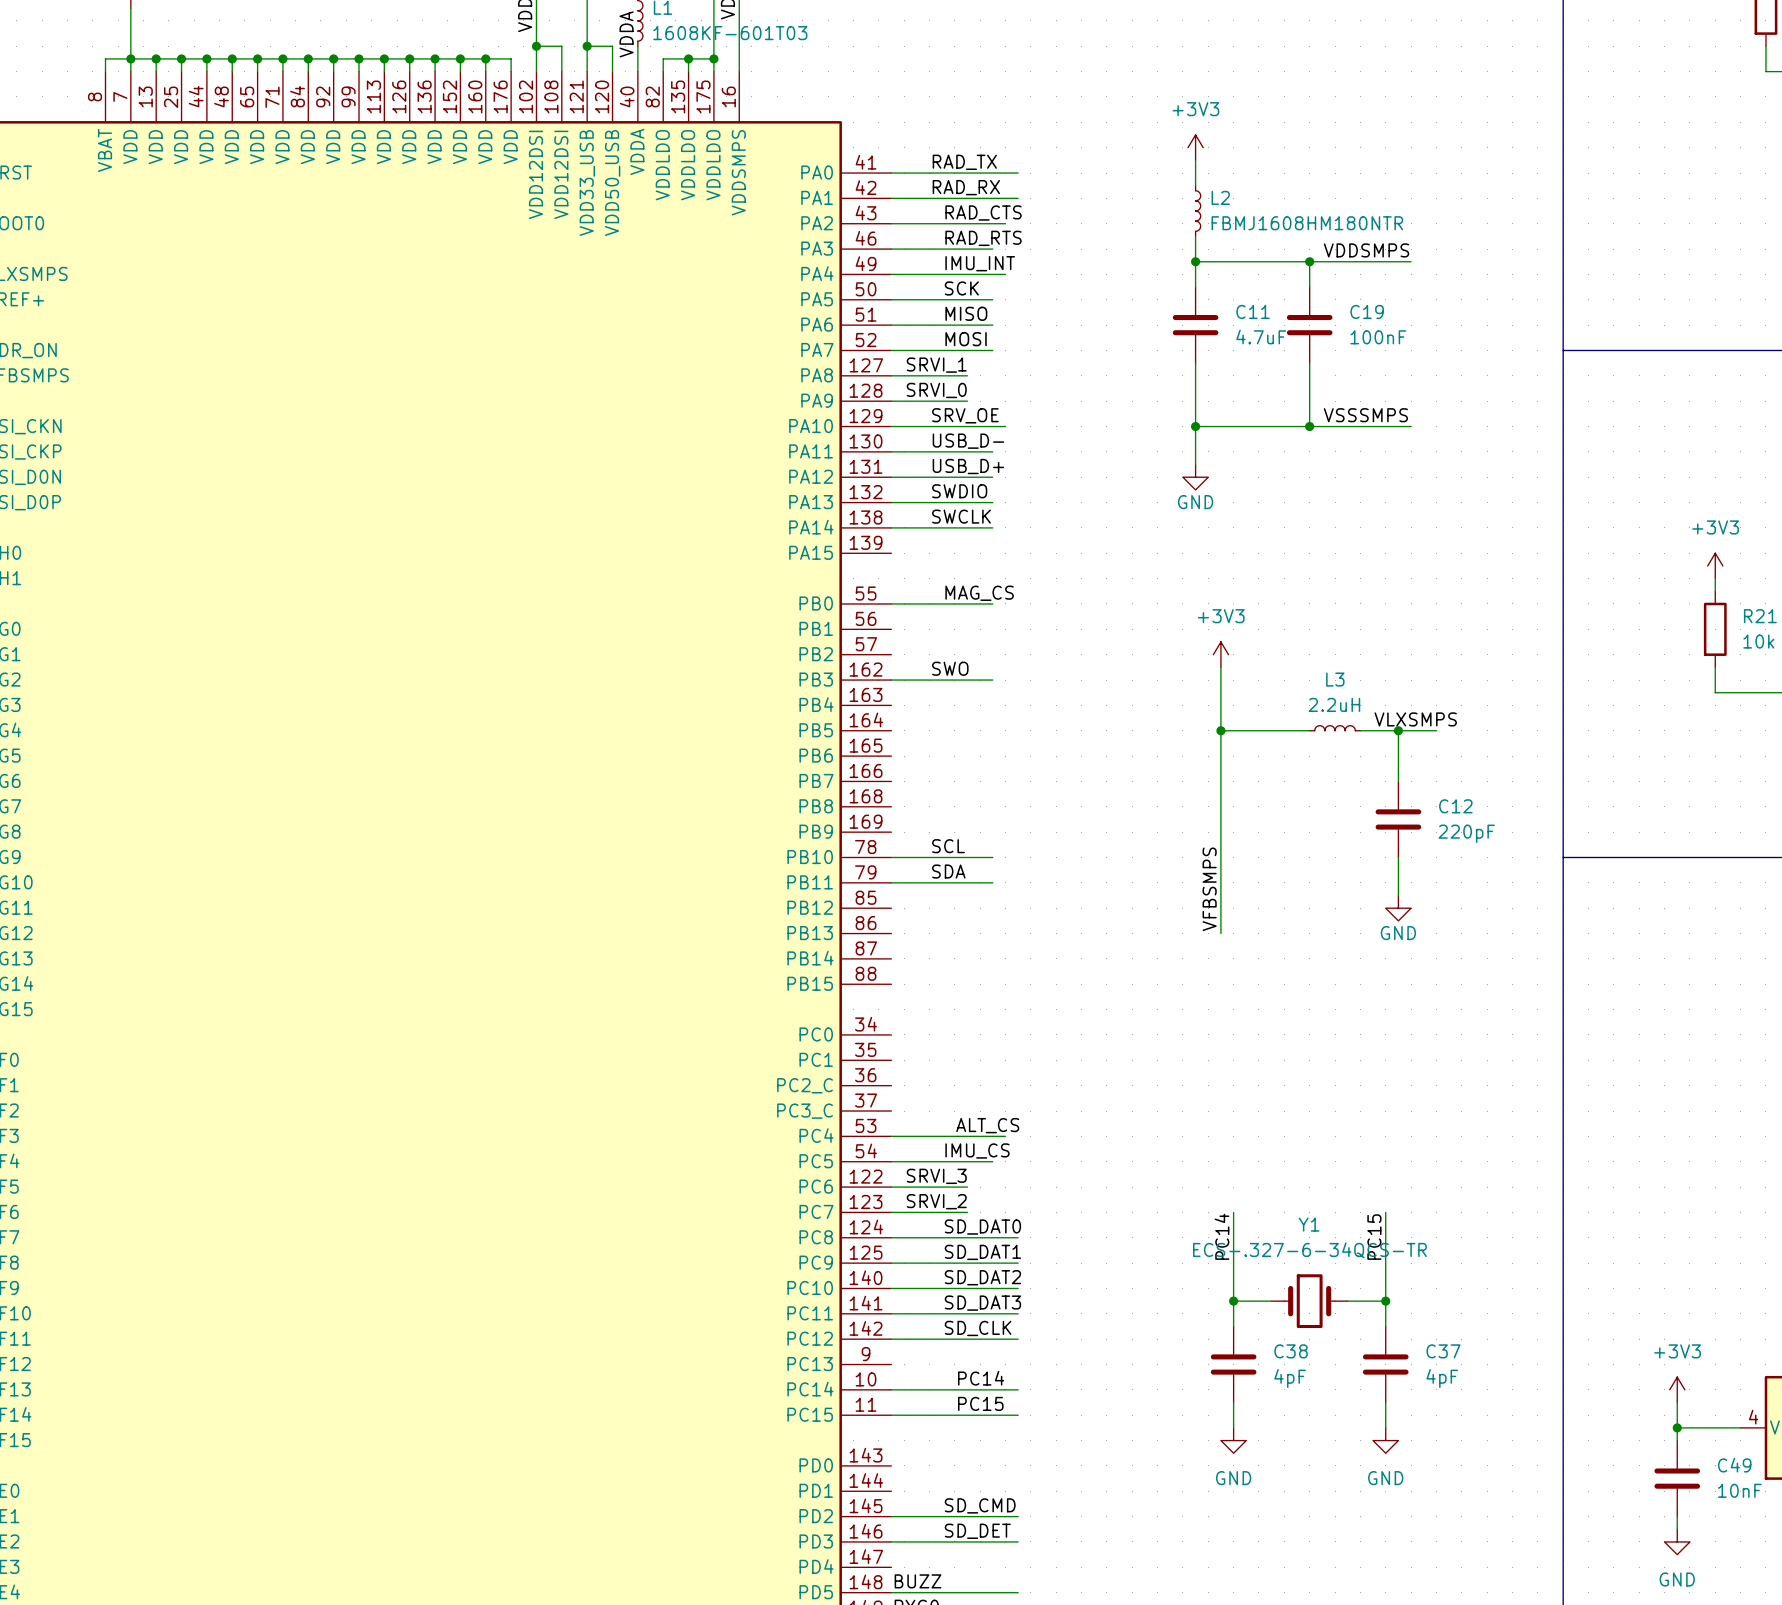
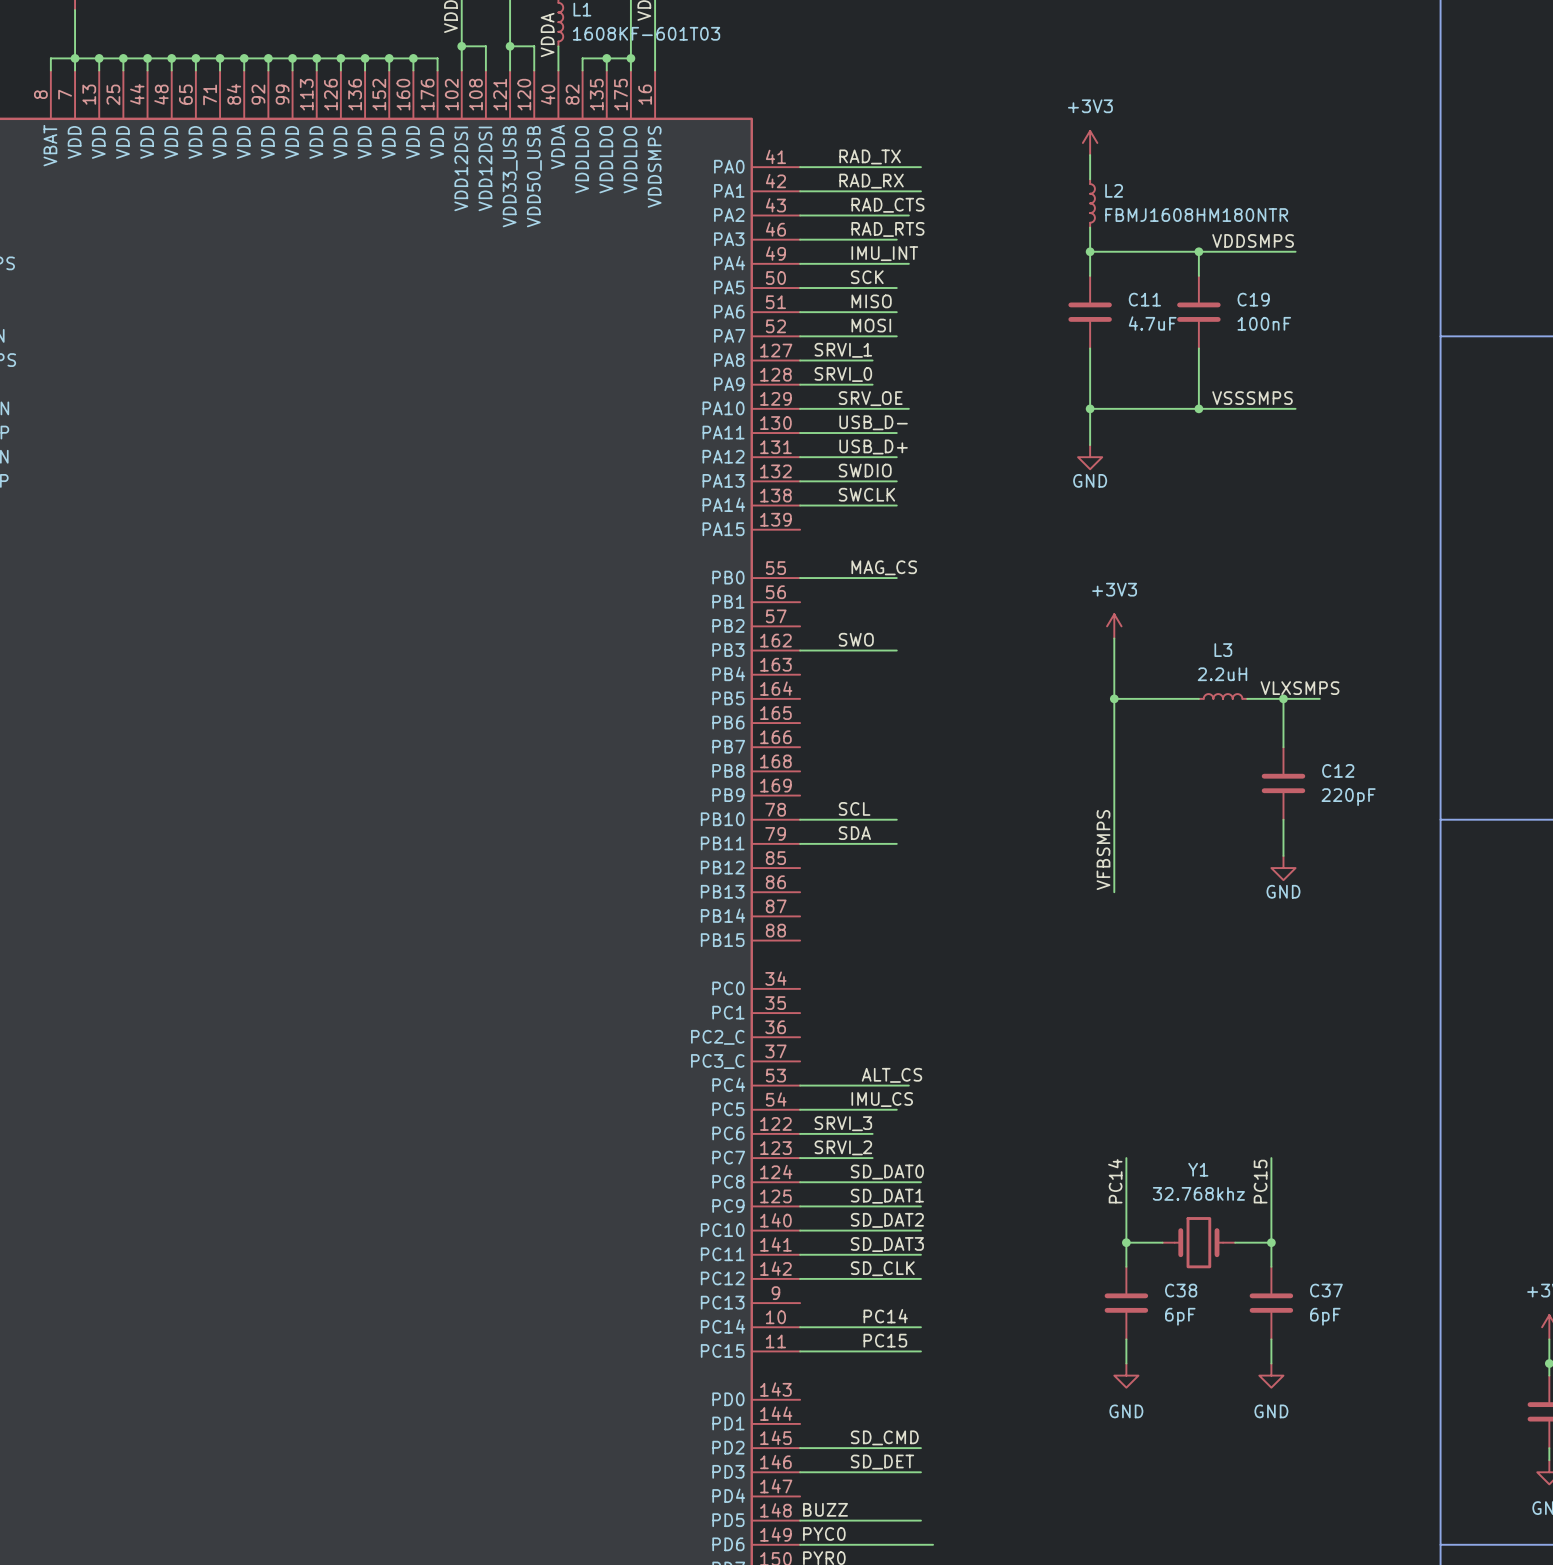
Y1 value: ECS-.327-6-34QCS-TR (1309, 1250) -> 32.768khz (1198, 1193)
C38 value: 4pF (1290, 1378) -> 6pF (1180, 1316)
C37 value: 4pF (1442, 1378) -> 6pF (1325, 1316)

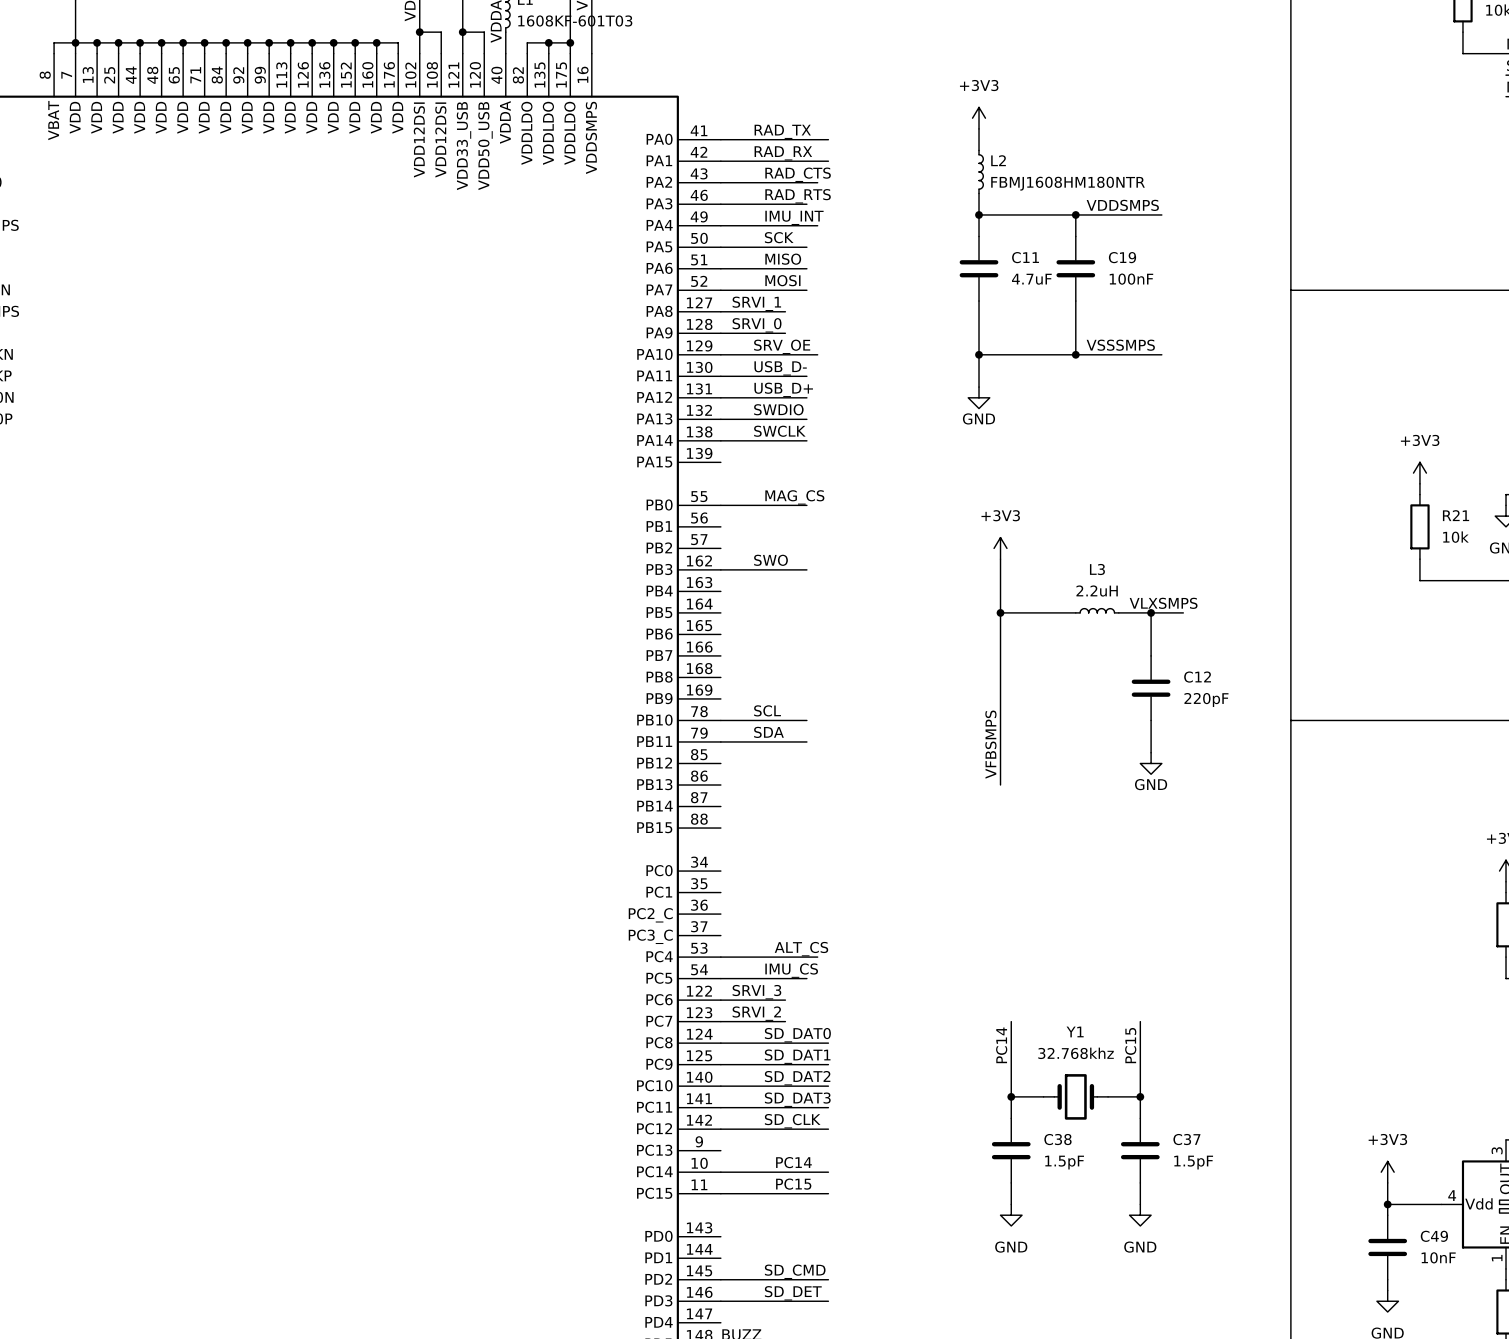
C38 value: 6pF (1180, 1316) -> 1.5pF (1064, 1162)
C37 value: 6pF (1325, 1316) -> 1.5pF (1193, 1162)

